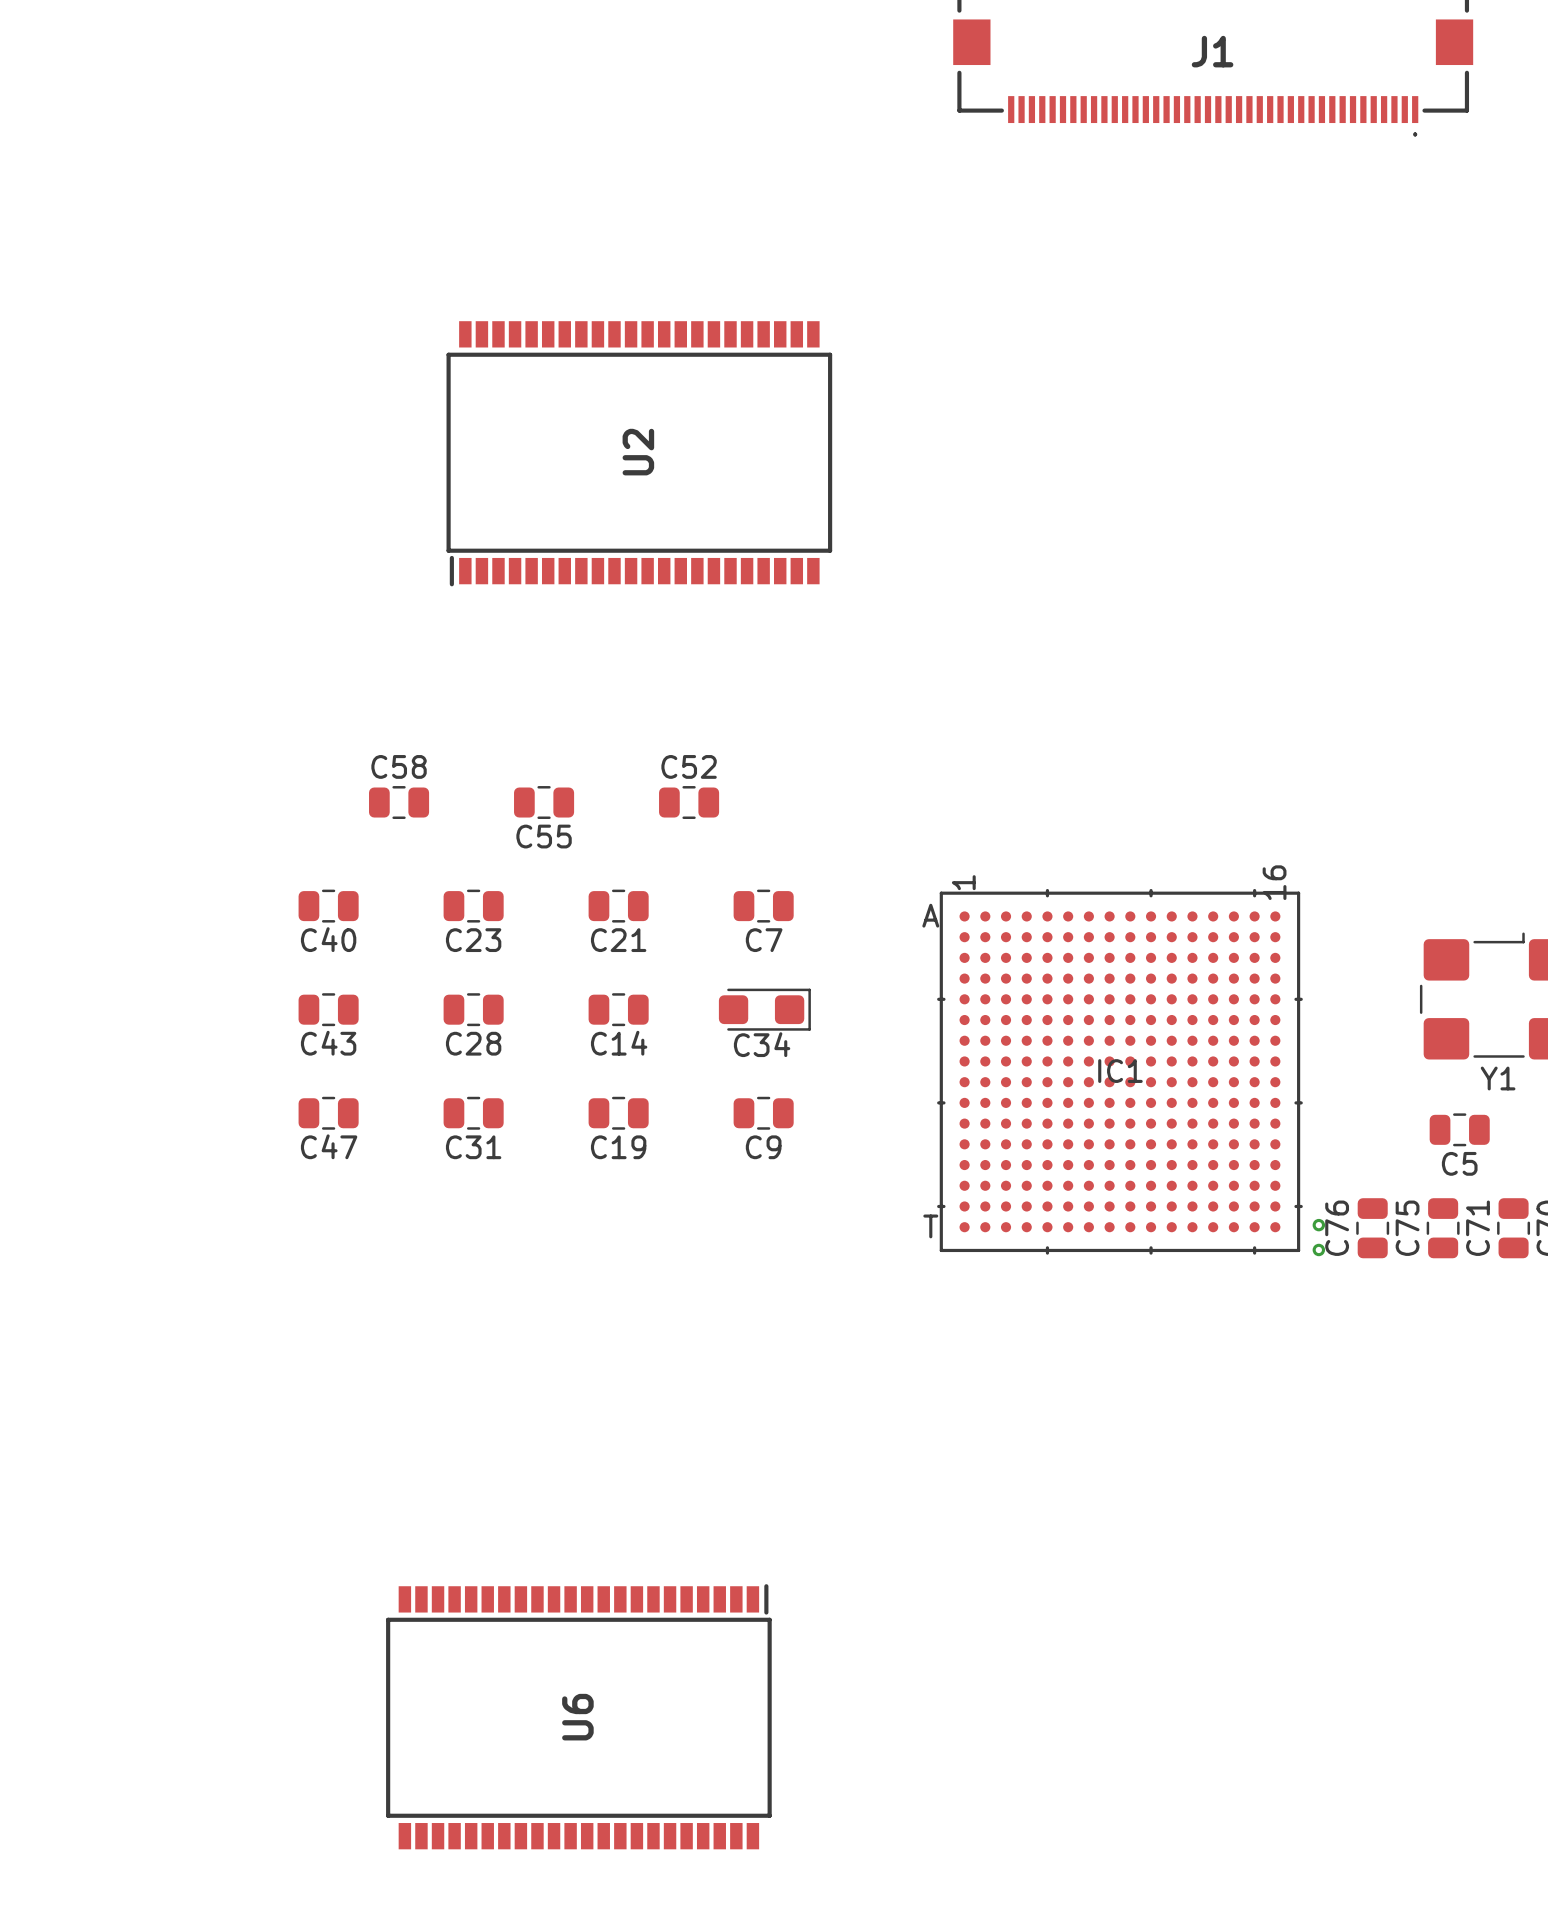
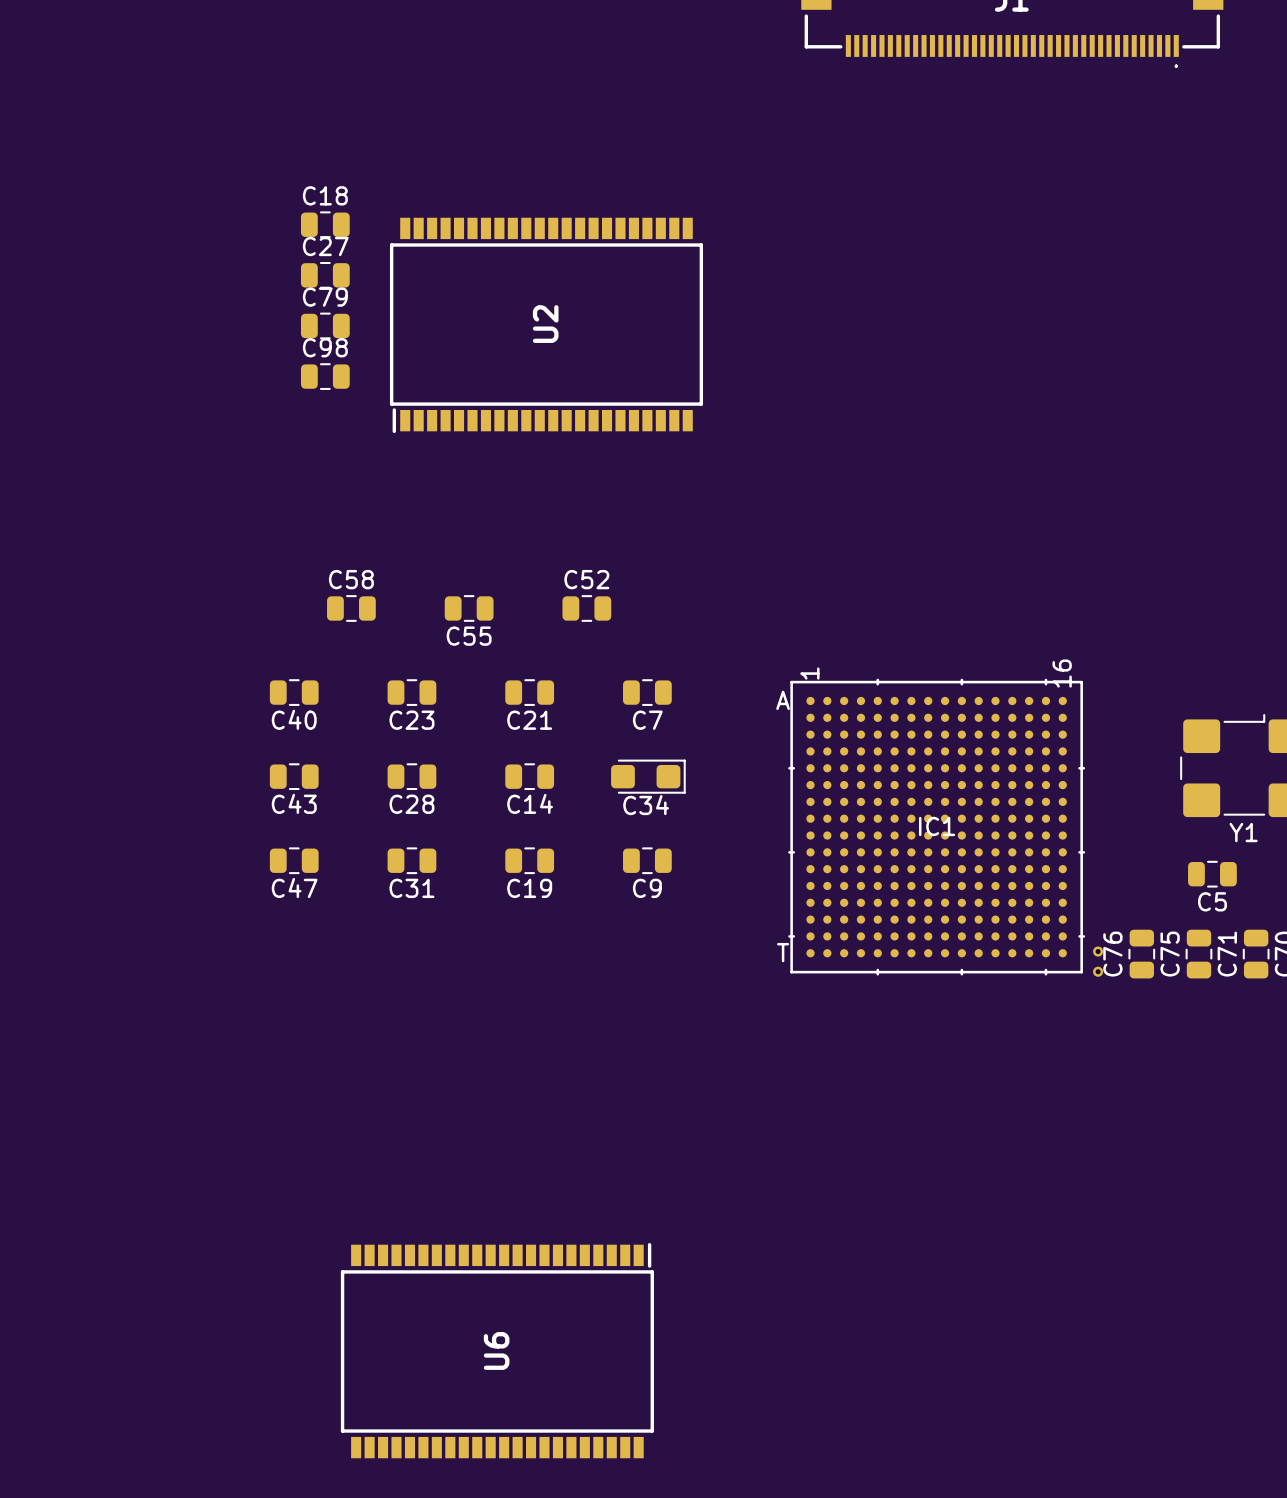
C18: none -> (325, 224)
C27: none -> (325, 275)
C79: none -> (325, 325)
C98: none -> (325, 376)

